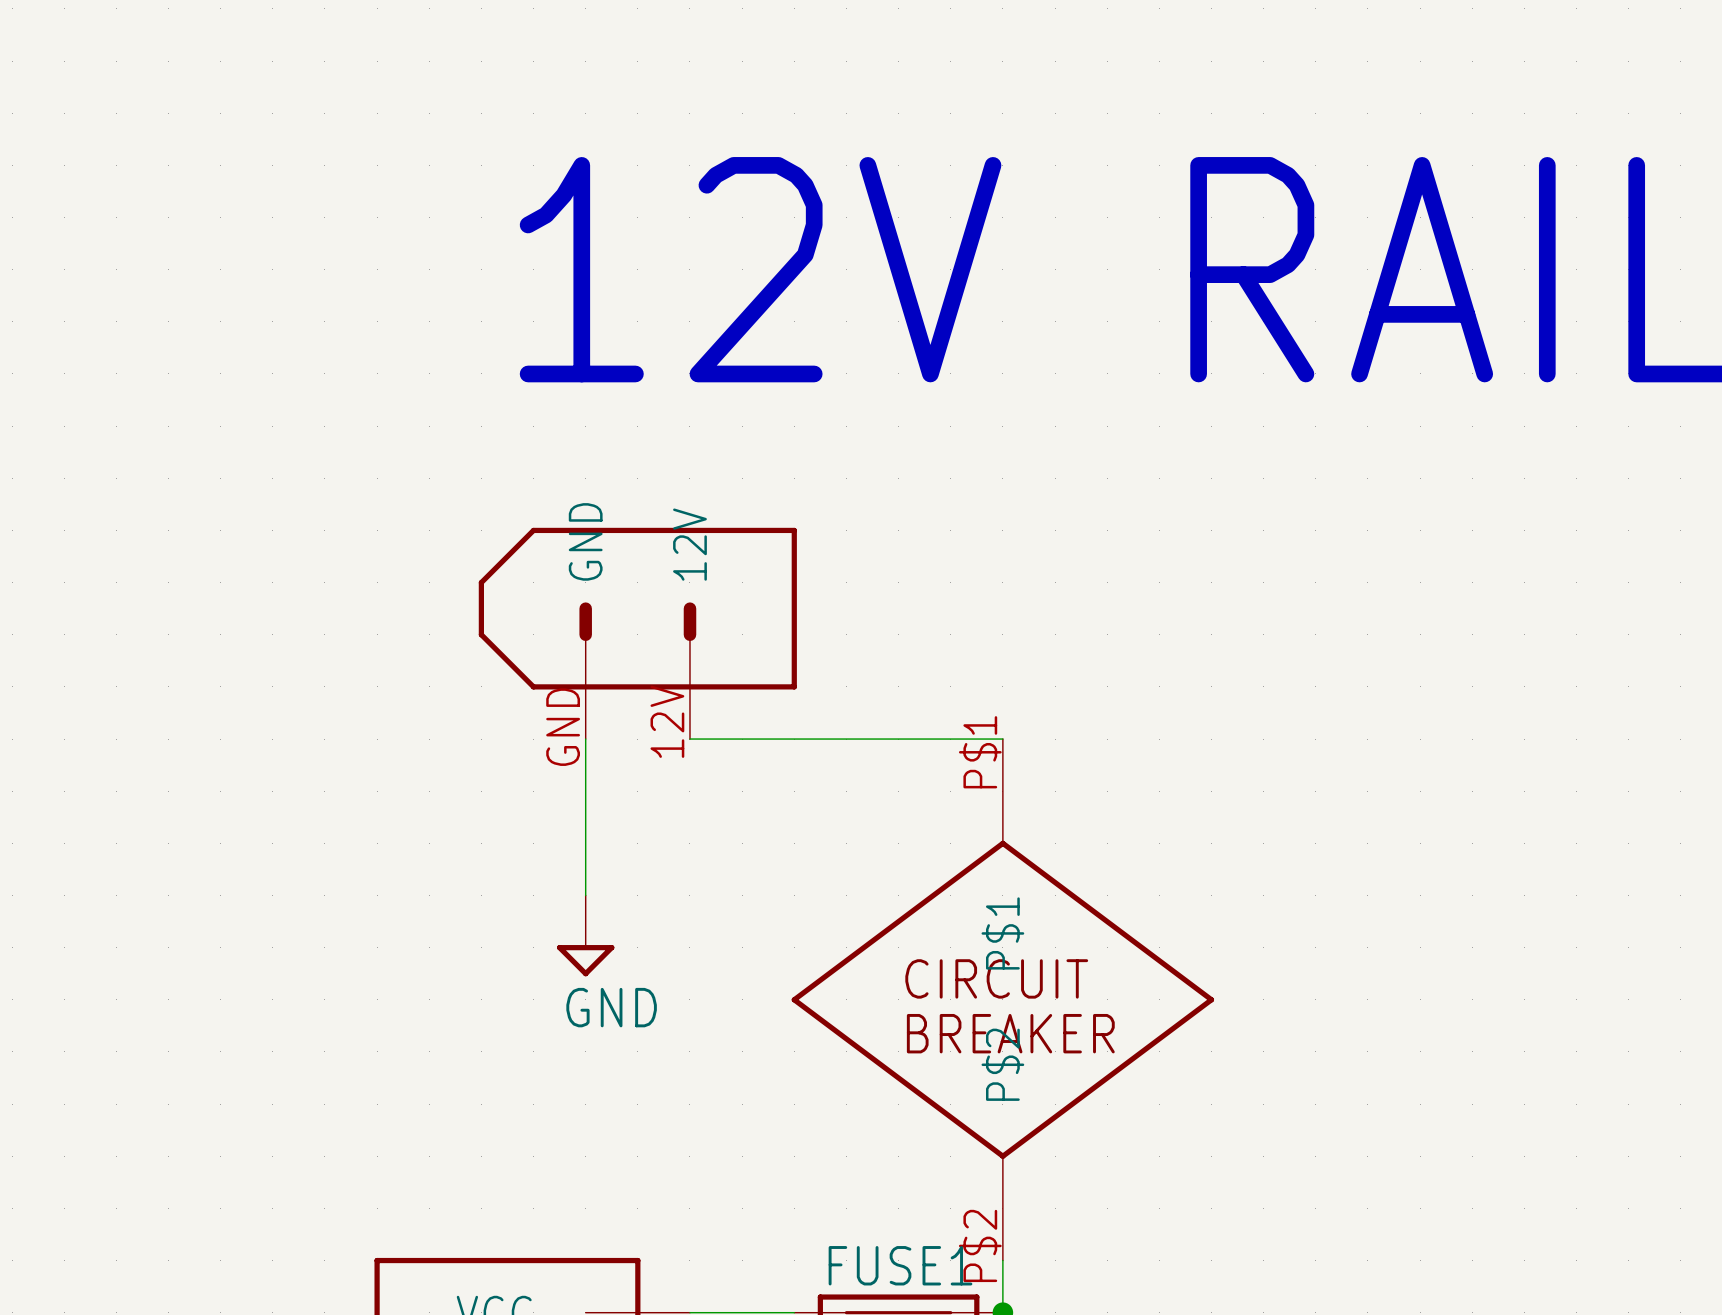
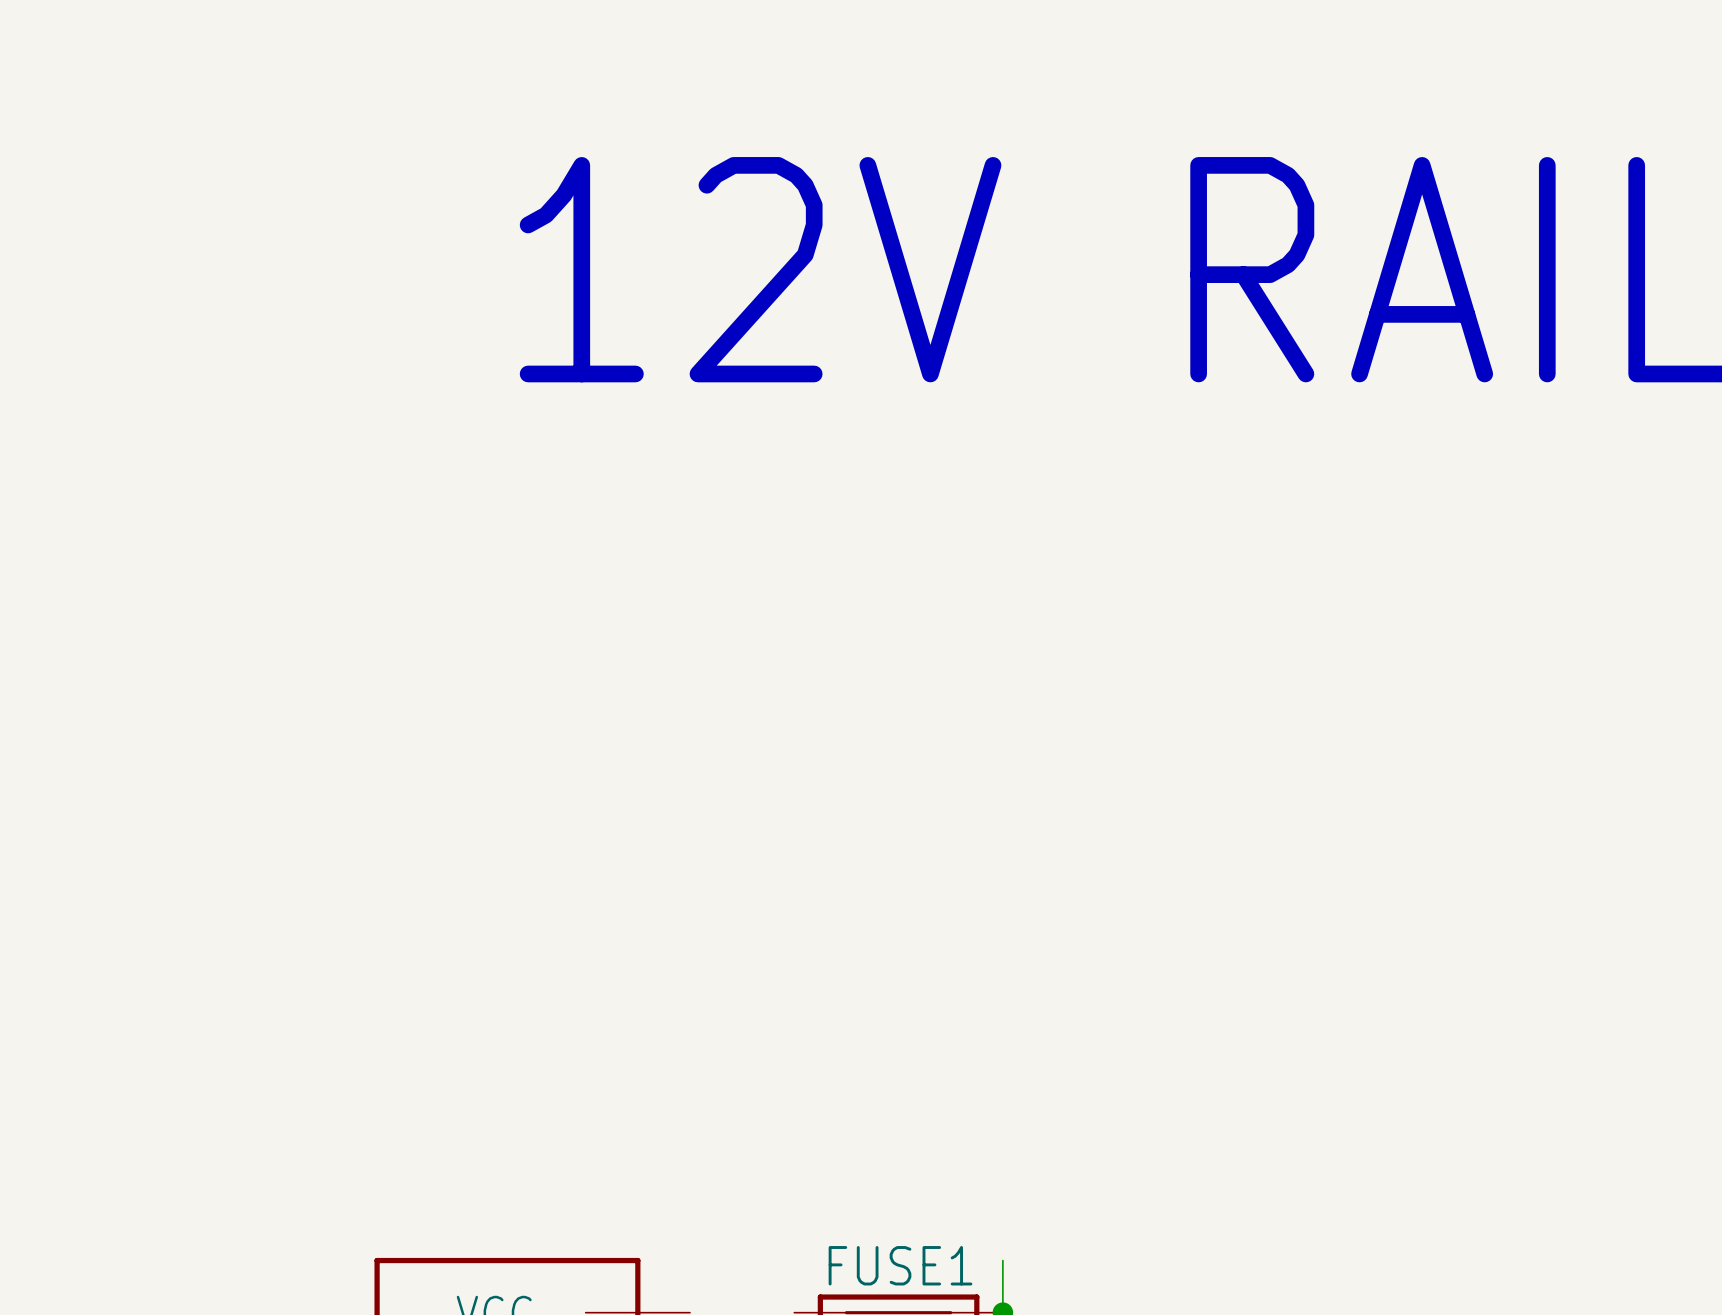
part: (637, 633) -> none
wire: (585, 739) (585, 895) -> none
wire: (689, 739) (1002, 739) -> none
power symbol: GND (585, 935) -> none
part: (1002, 999) -> none
wire: (689, 1312) (794, 1312) -> none

